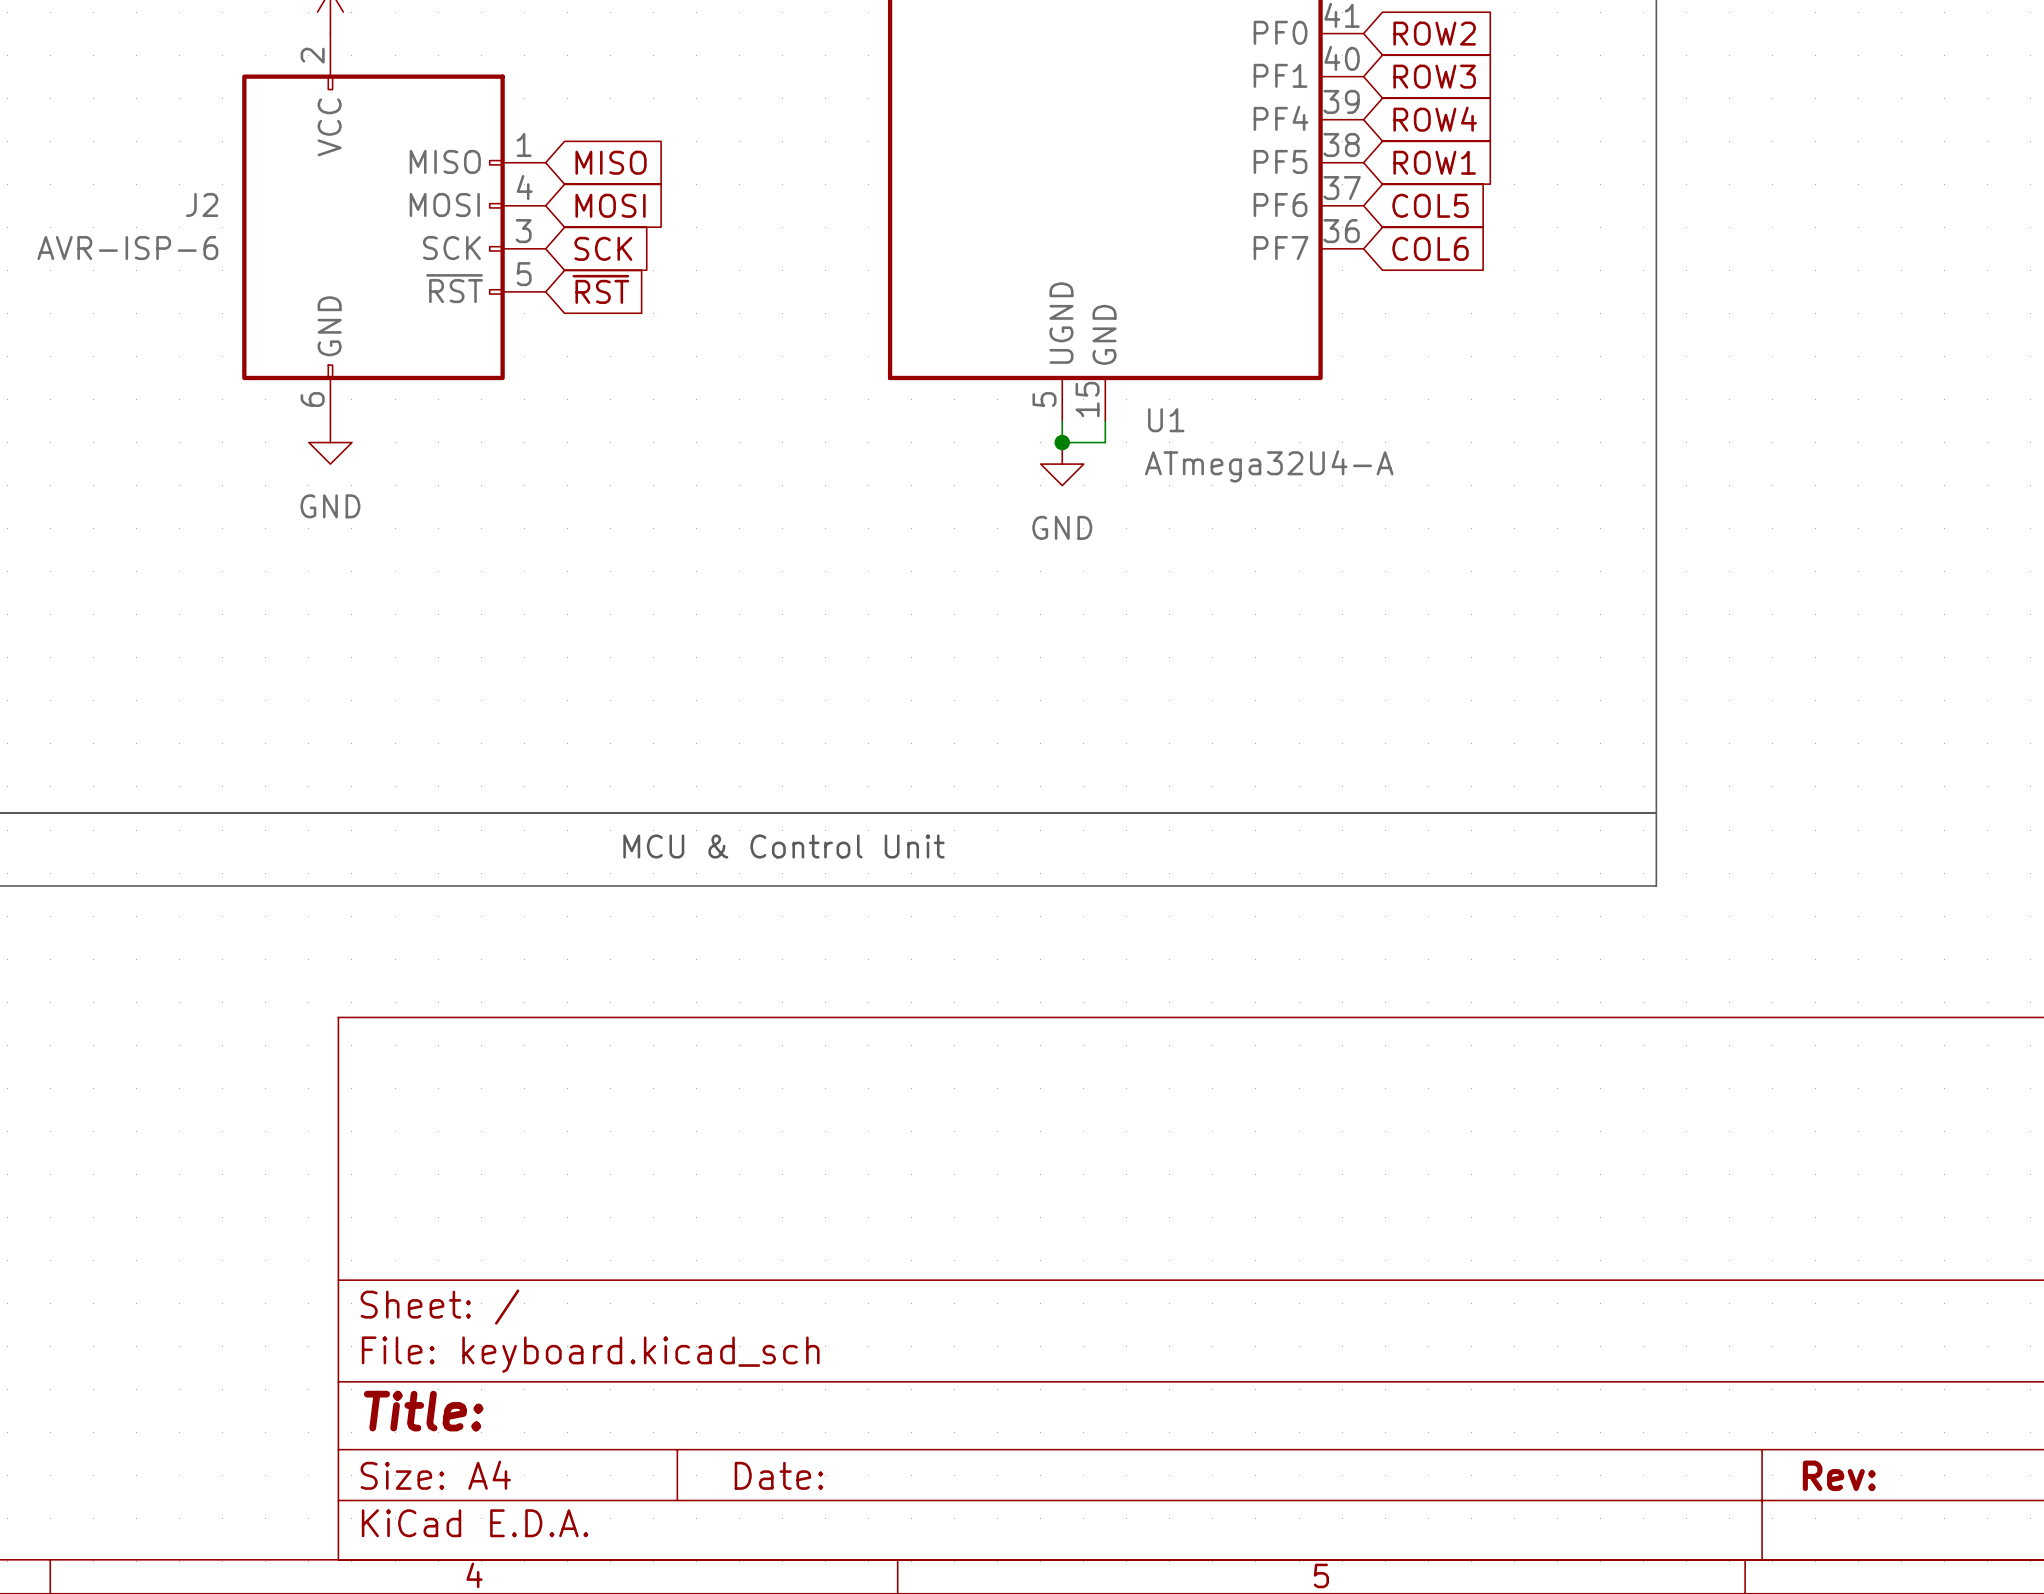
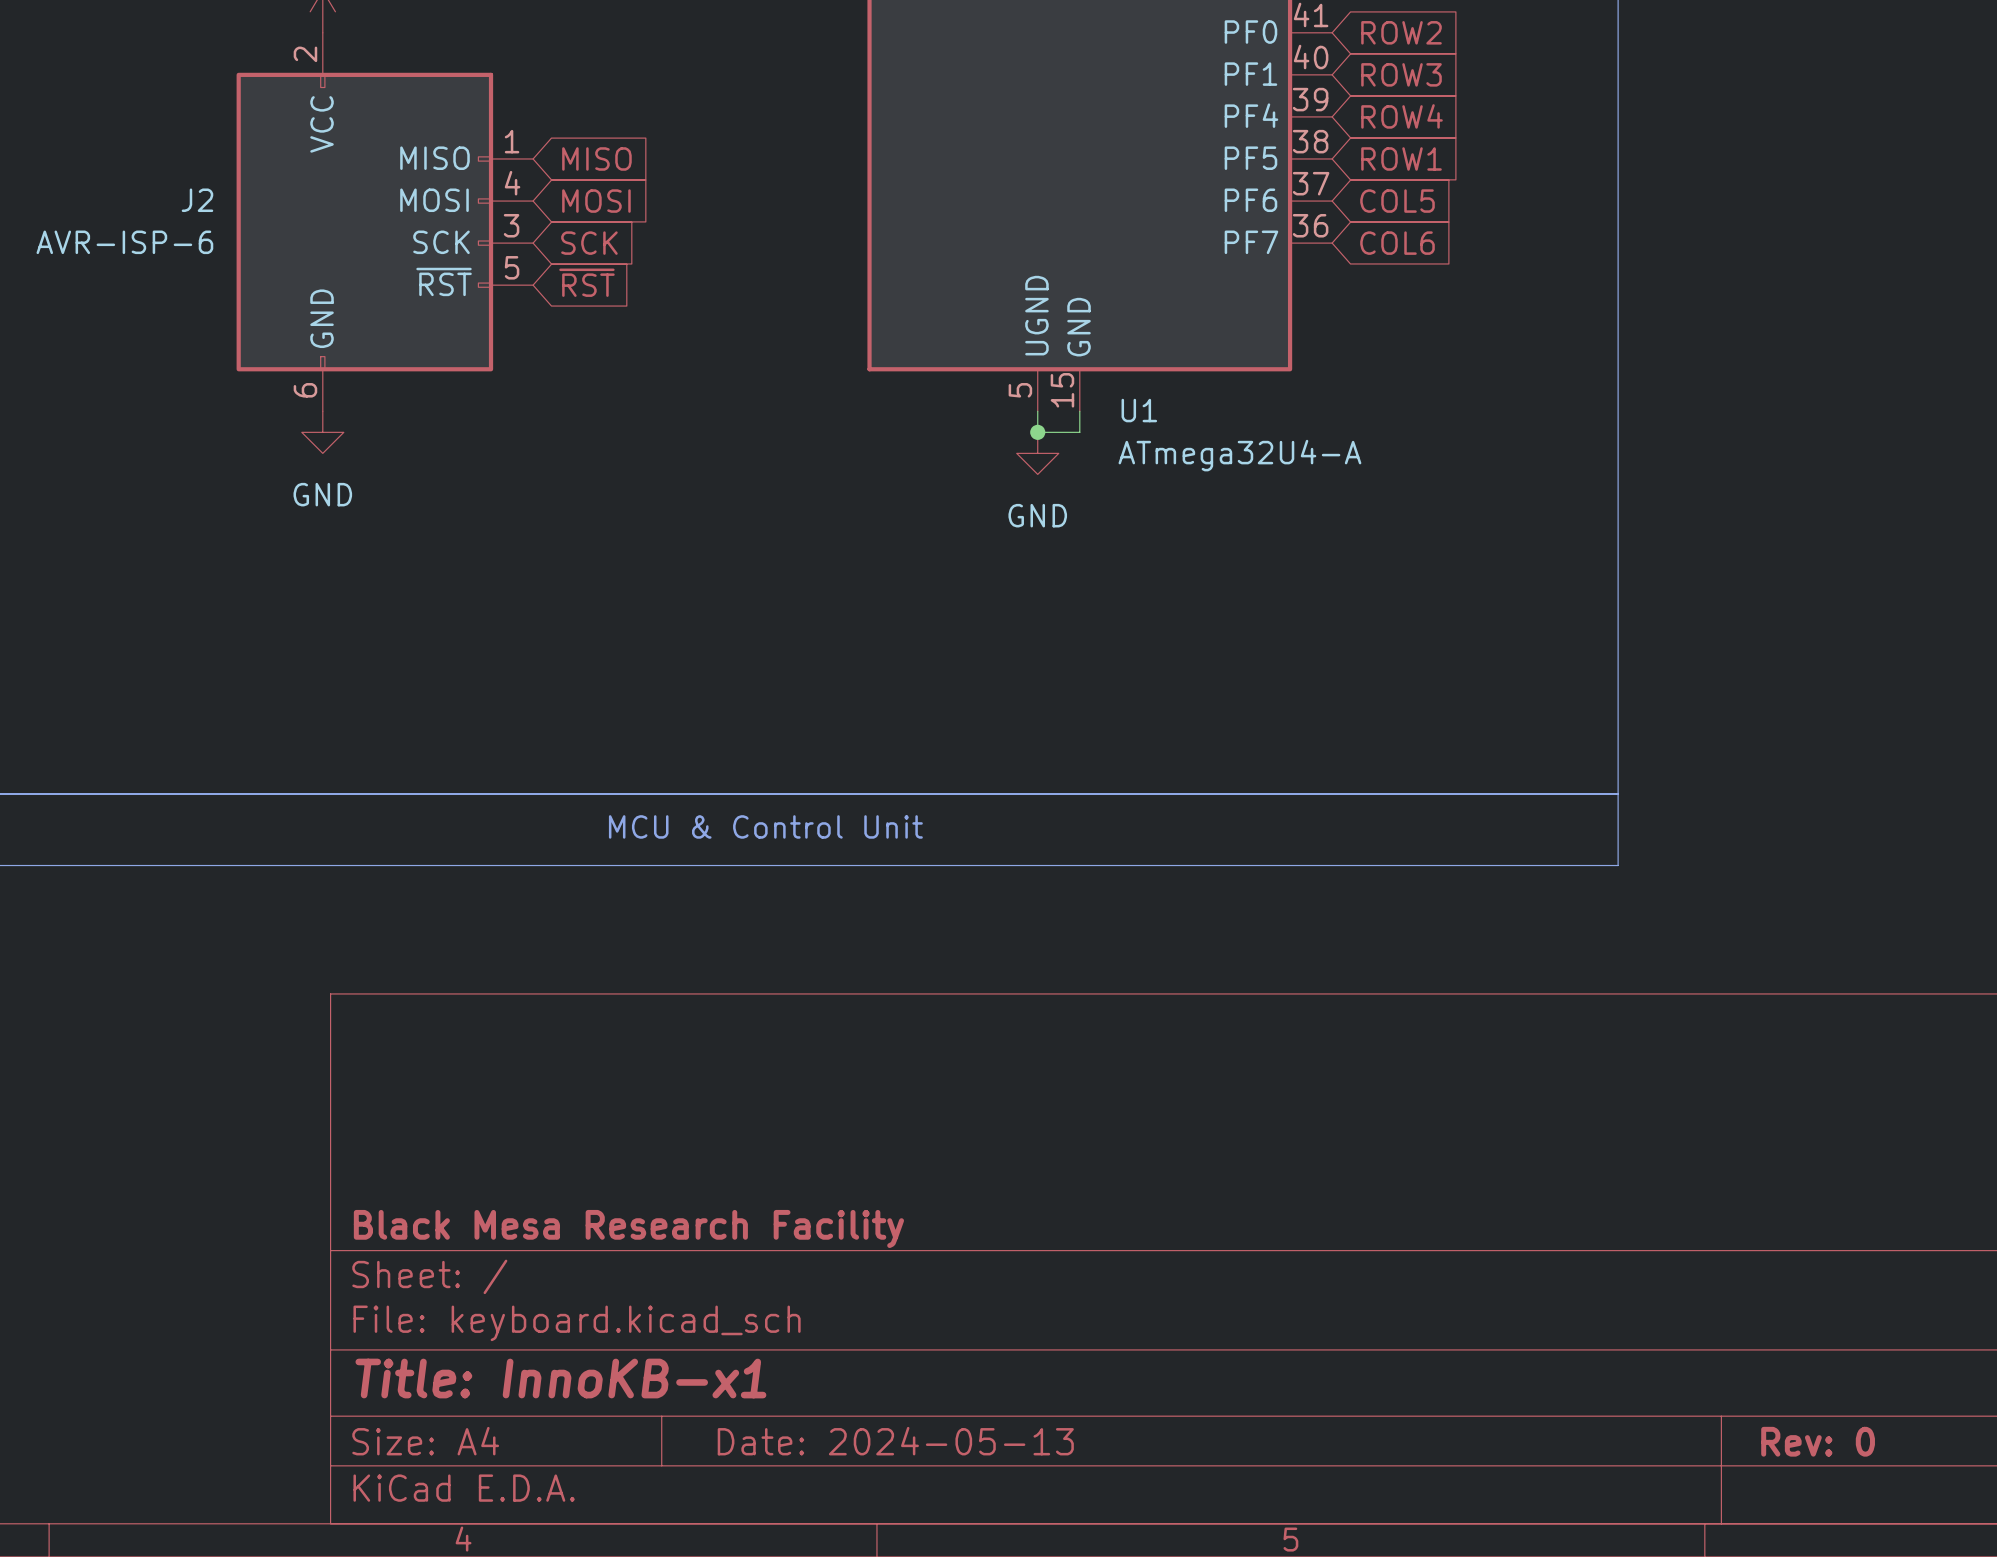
title block: none -> Black Mesa Research Facility (628, 1228)
title block: Title: (423, 1411) -> Title: InnoKB-x1 (560, 1378)
title block: Date: (778, 1475) -> Date: 2024-05-13 (895, 1441)
title block: Rev: (1839, 1475) -> Rev: 0 (1818, 1441)

